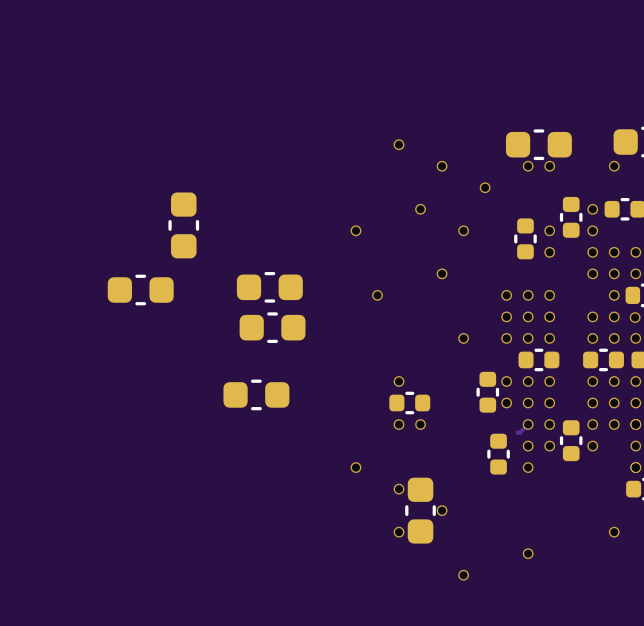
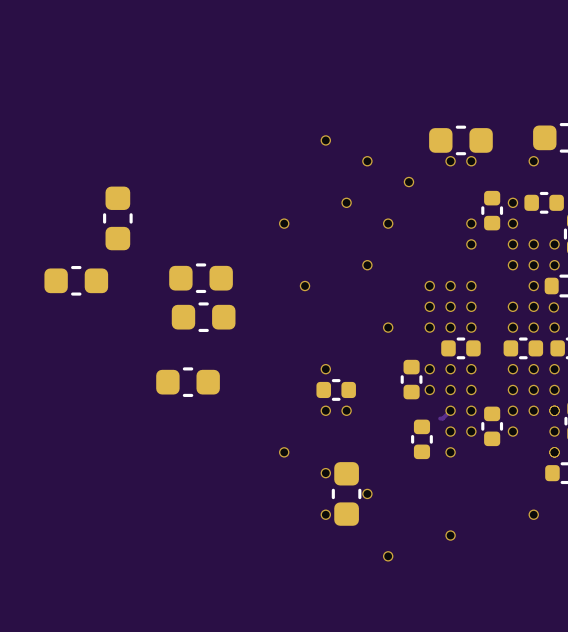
part: (525, 238) -> none

